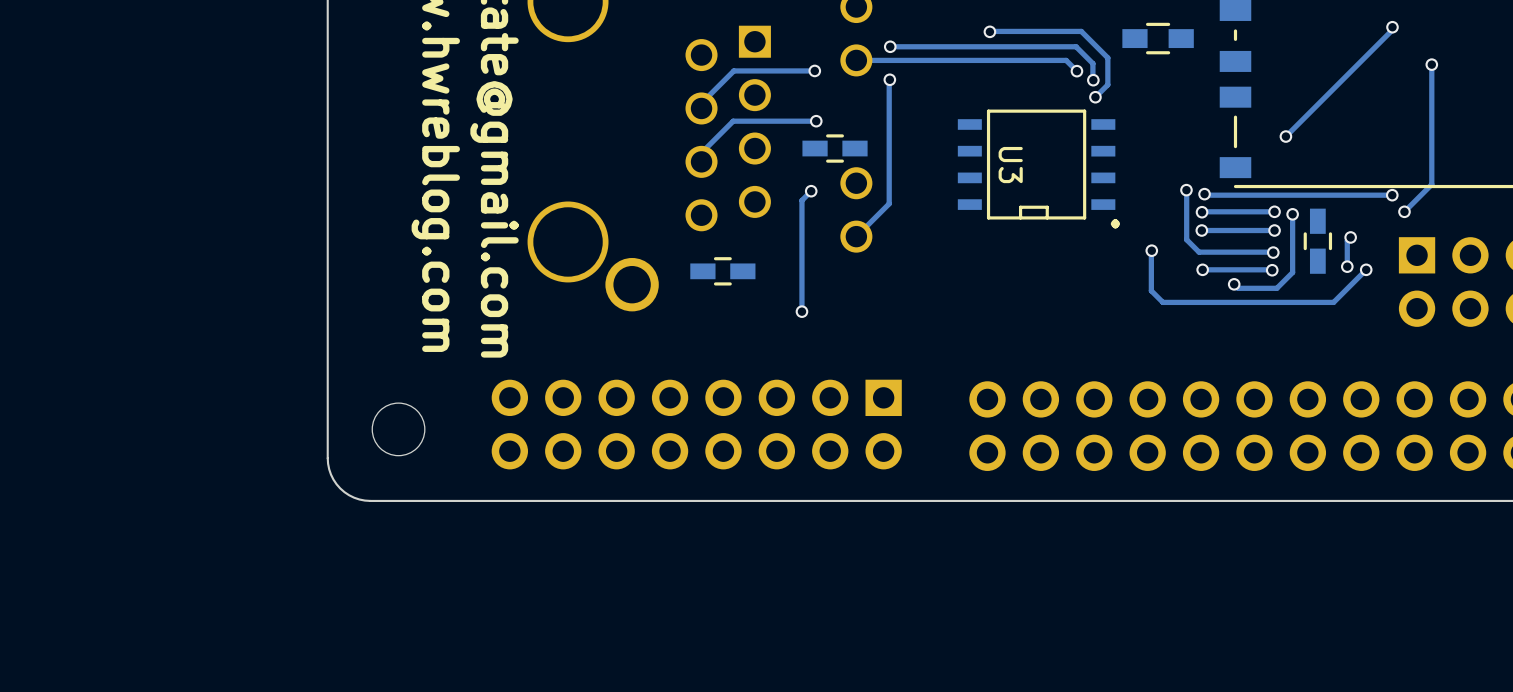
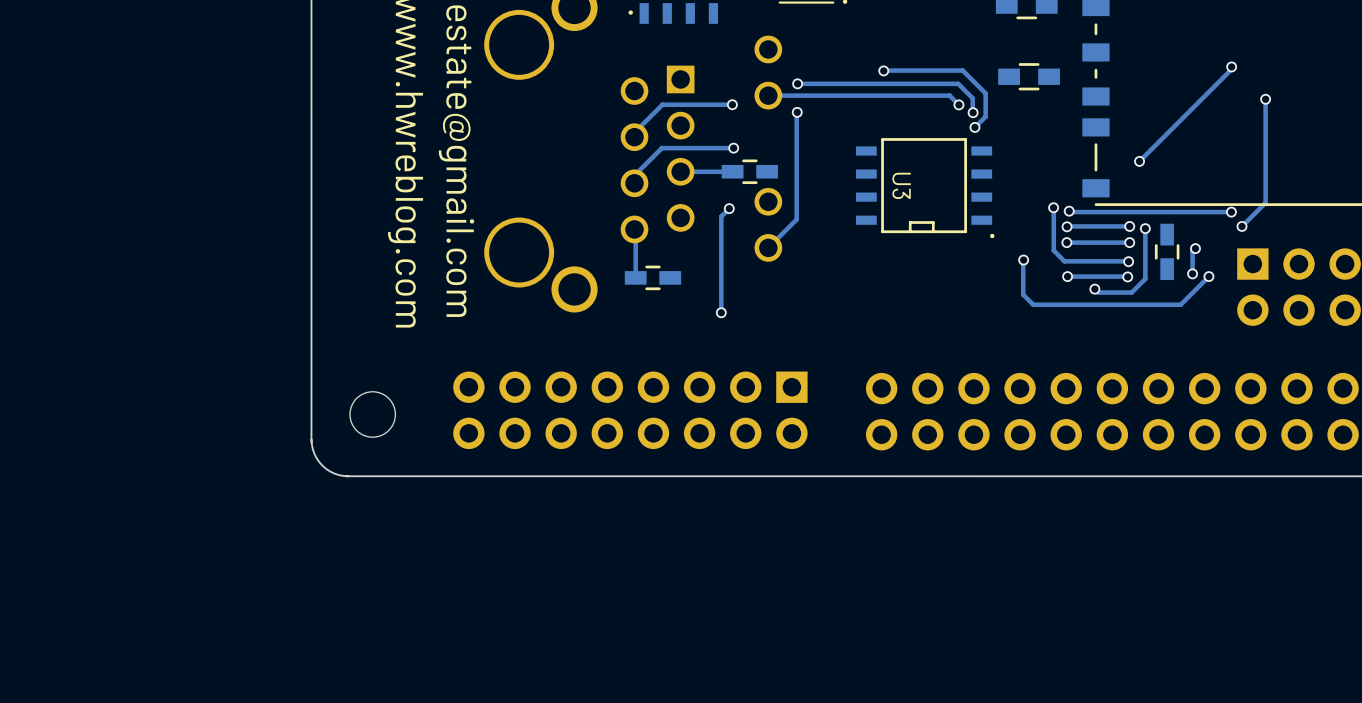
track: none -> (732, 171) (680, 171)
track: none -> (634, 229) (635, 277)

